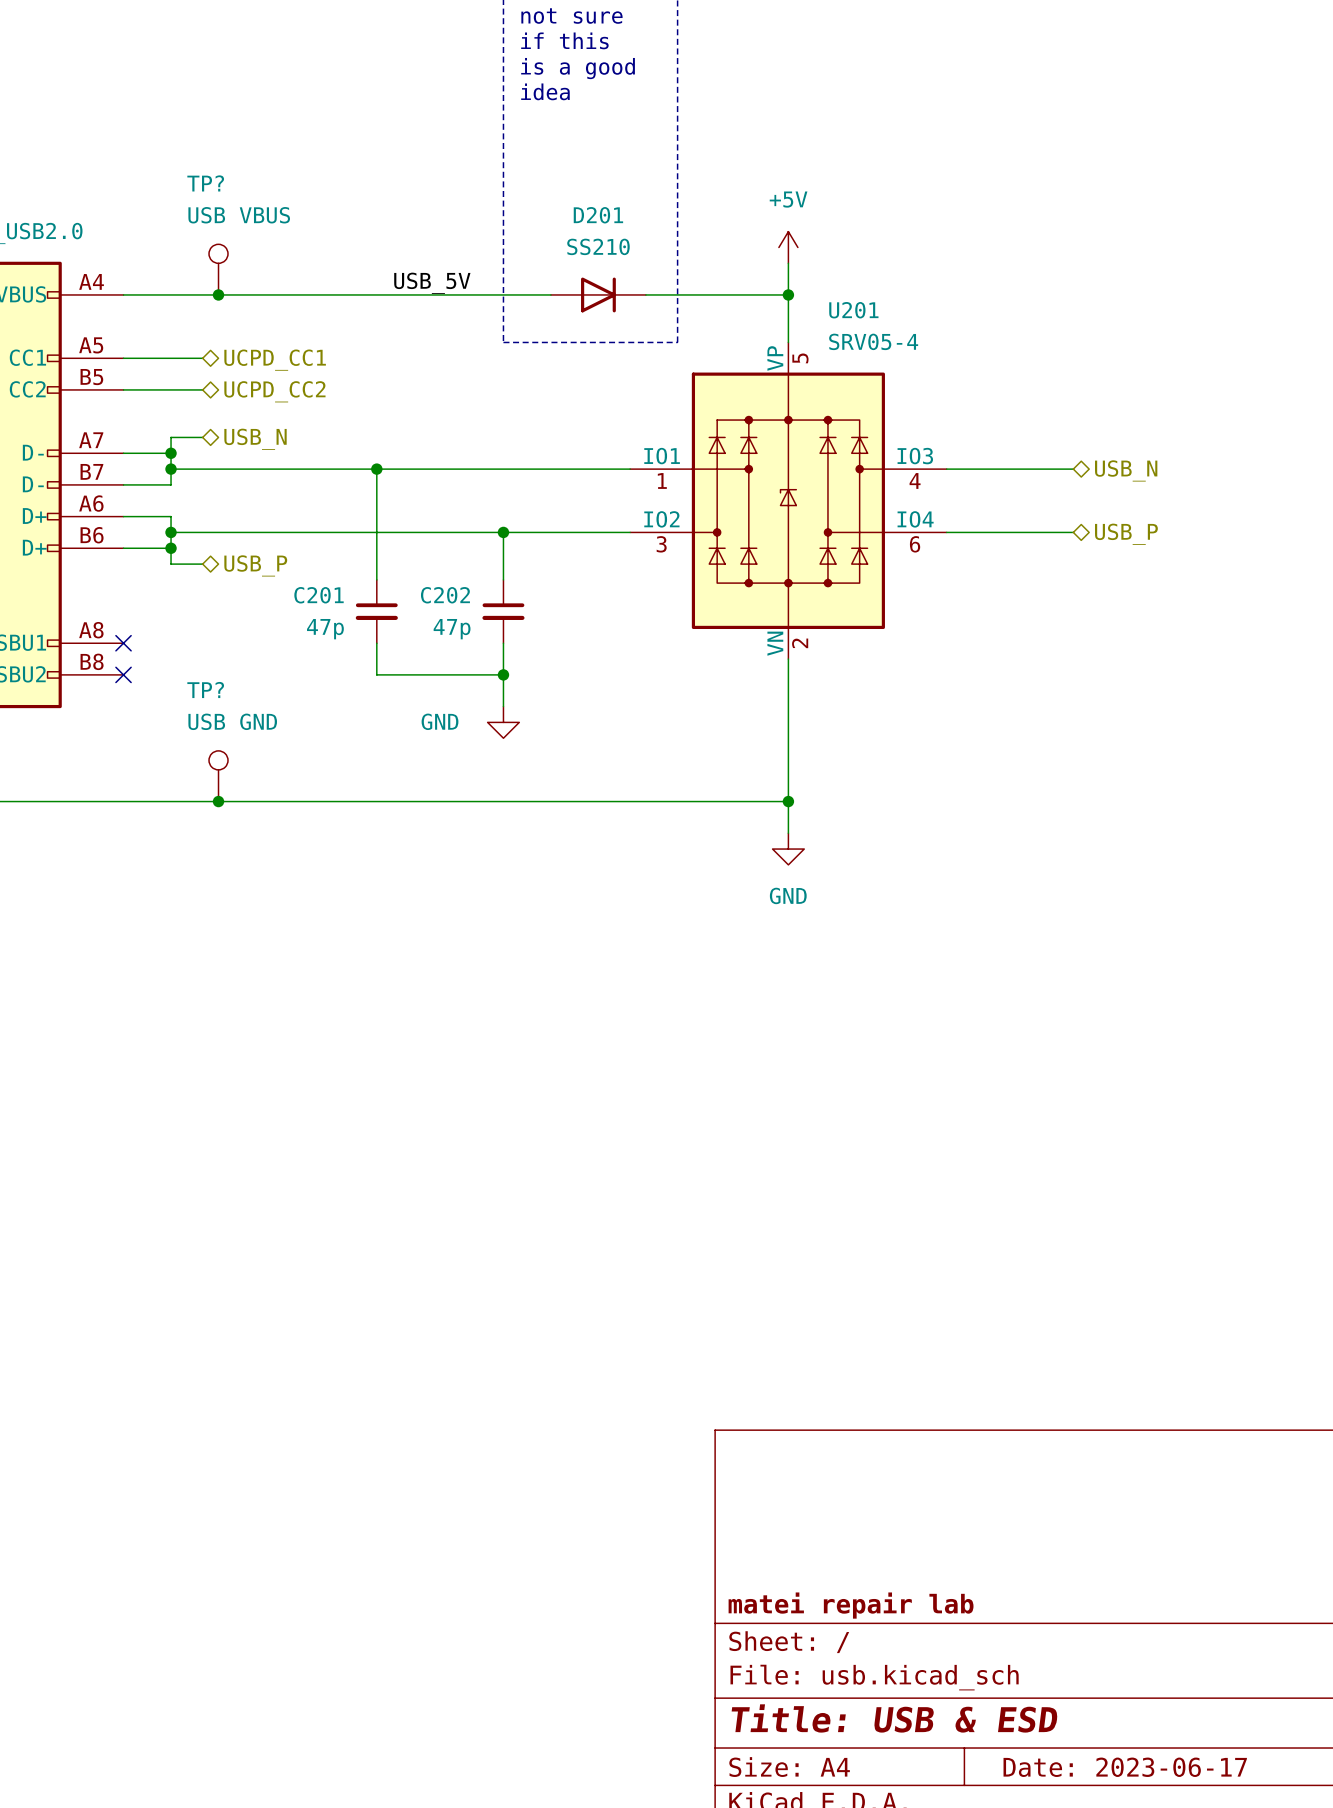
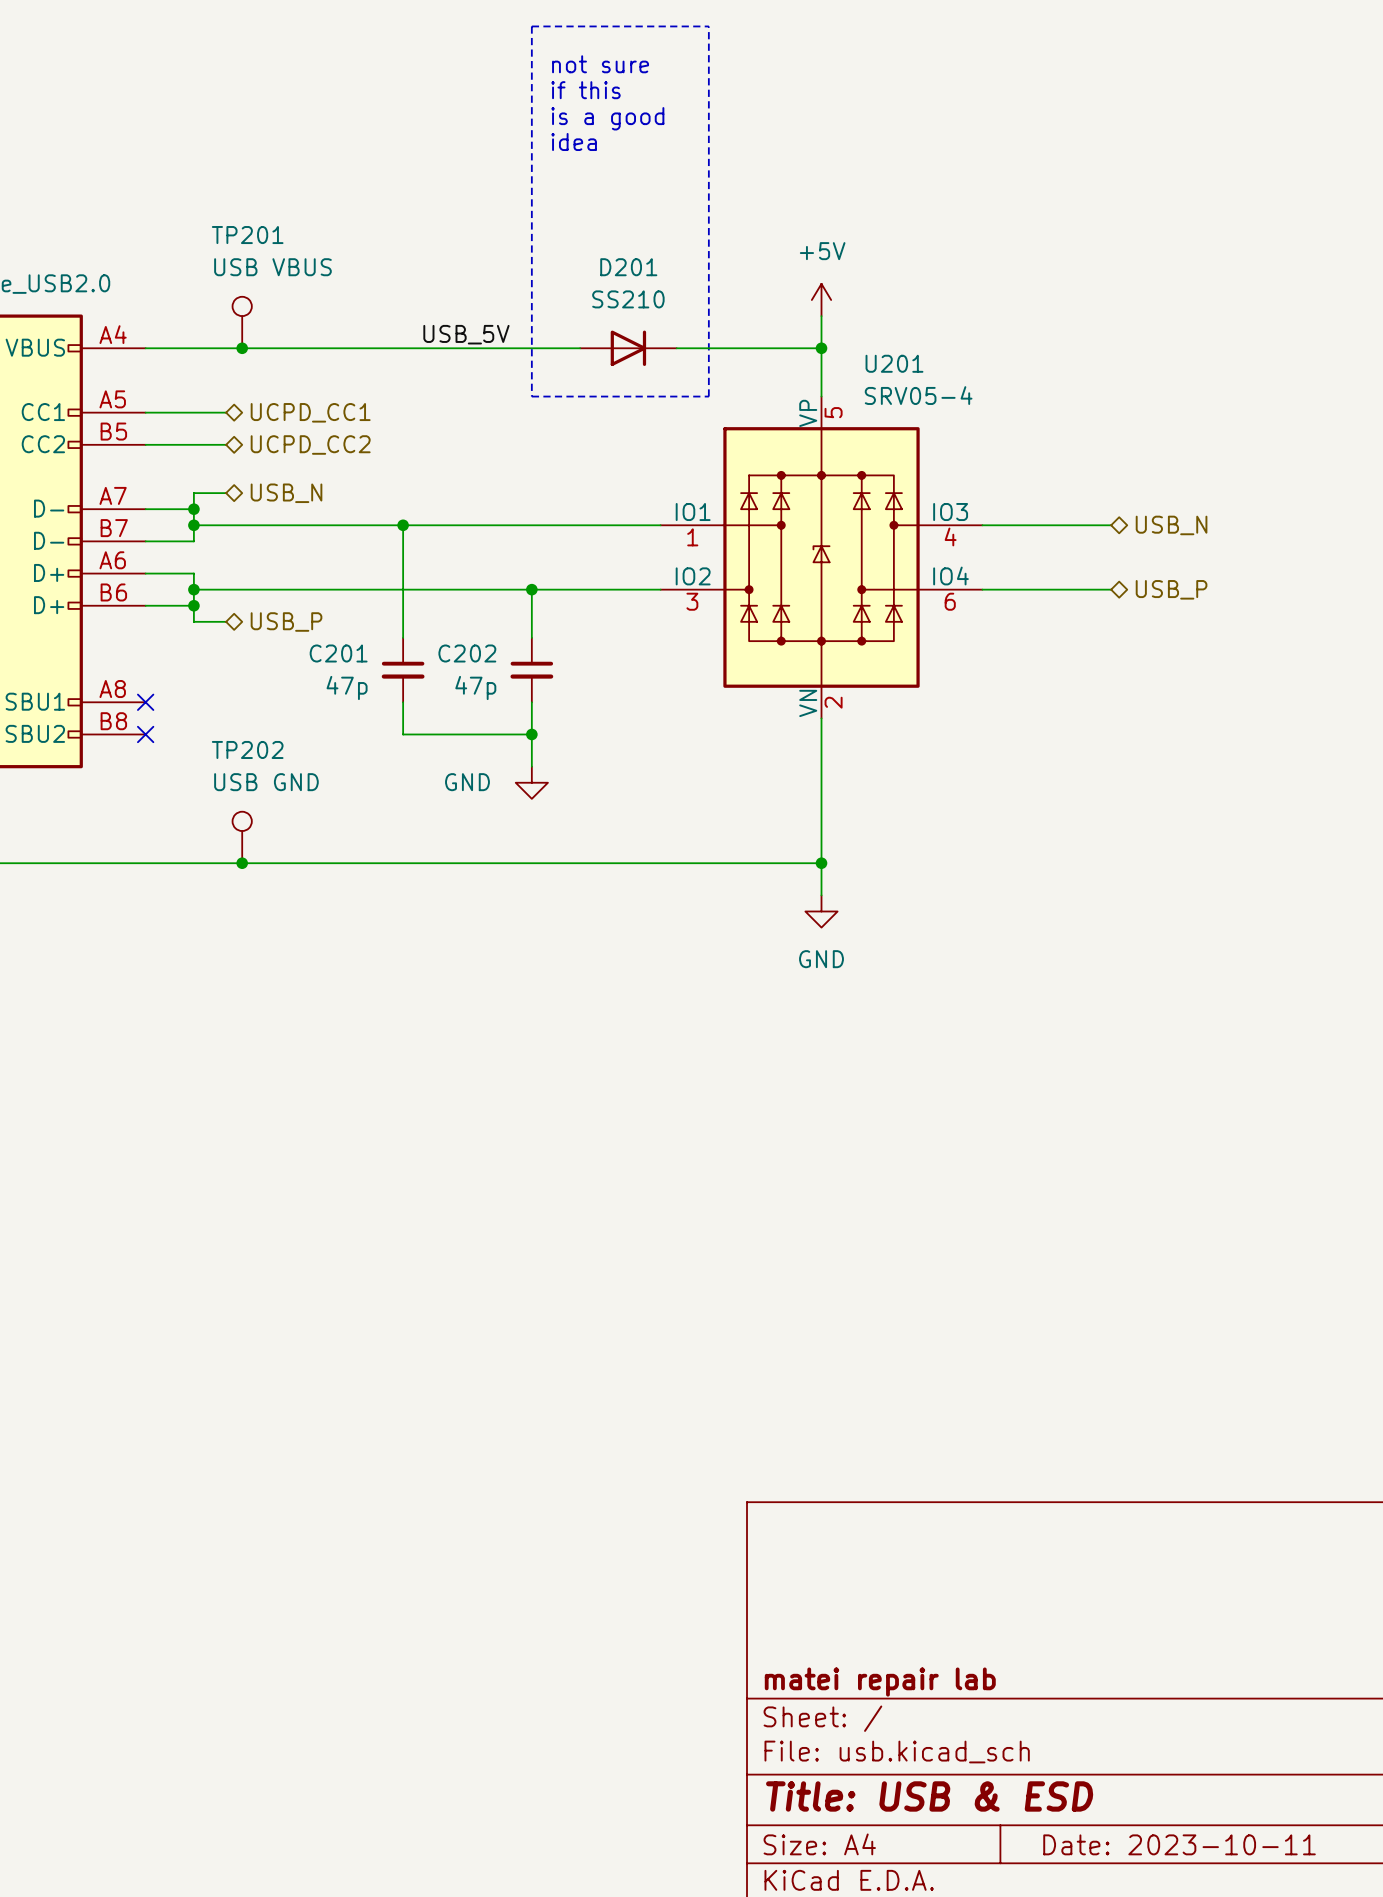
TP? name: TP? (205, 183) -> TP201 (247, 235)
TP? name: TP? (205, 690) -> TP202 (247, 749)
title block: Date: 2023-06-17 (1125, 1767) -> Date: 2023-10-11 (1179, 1844)

